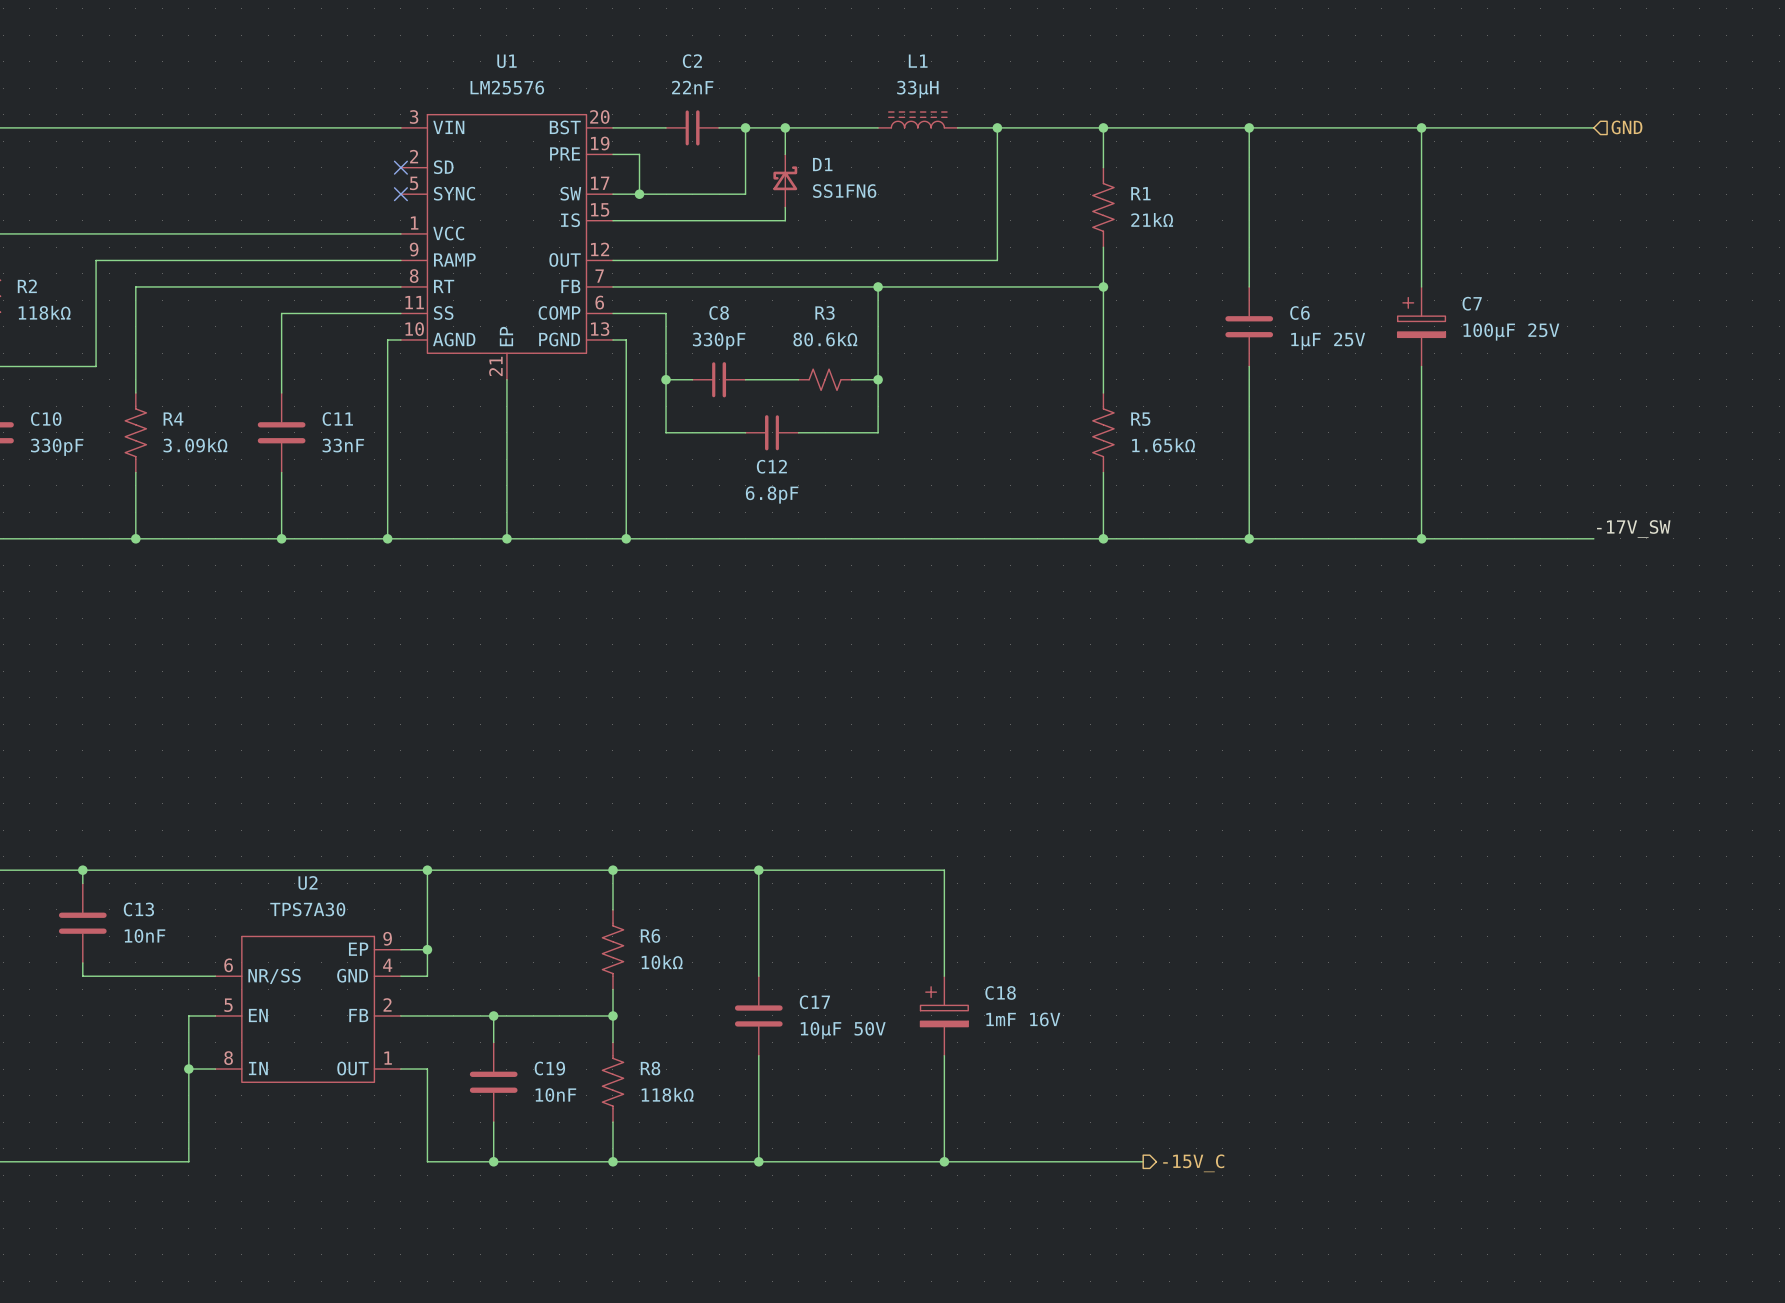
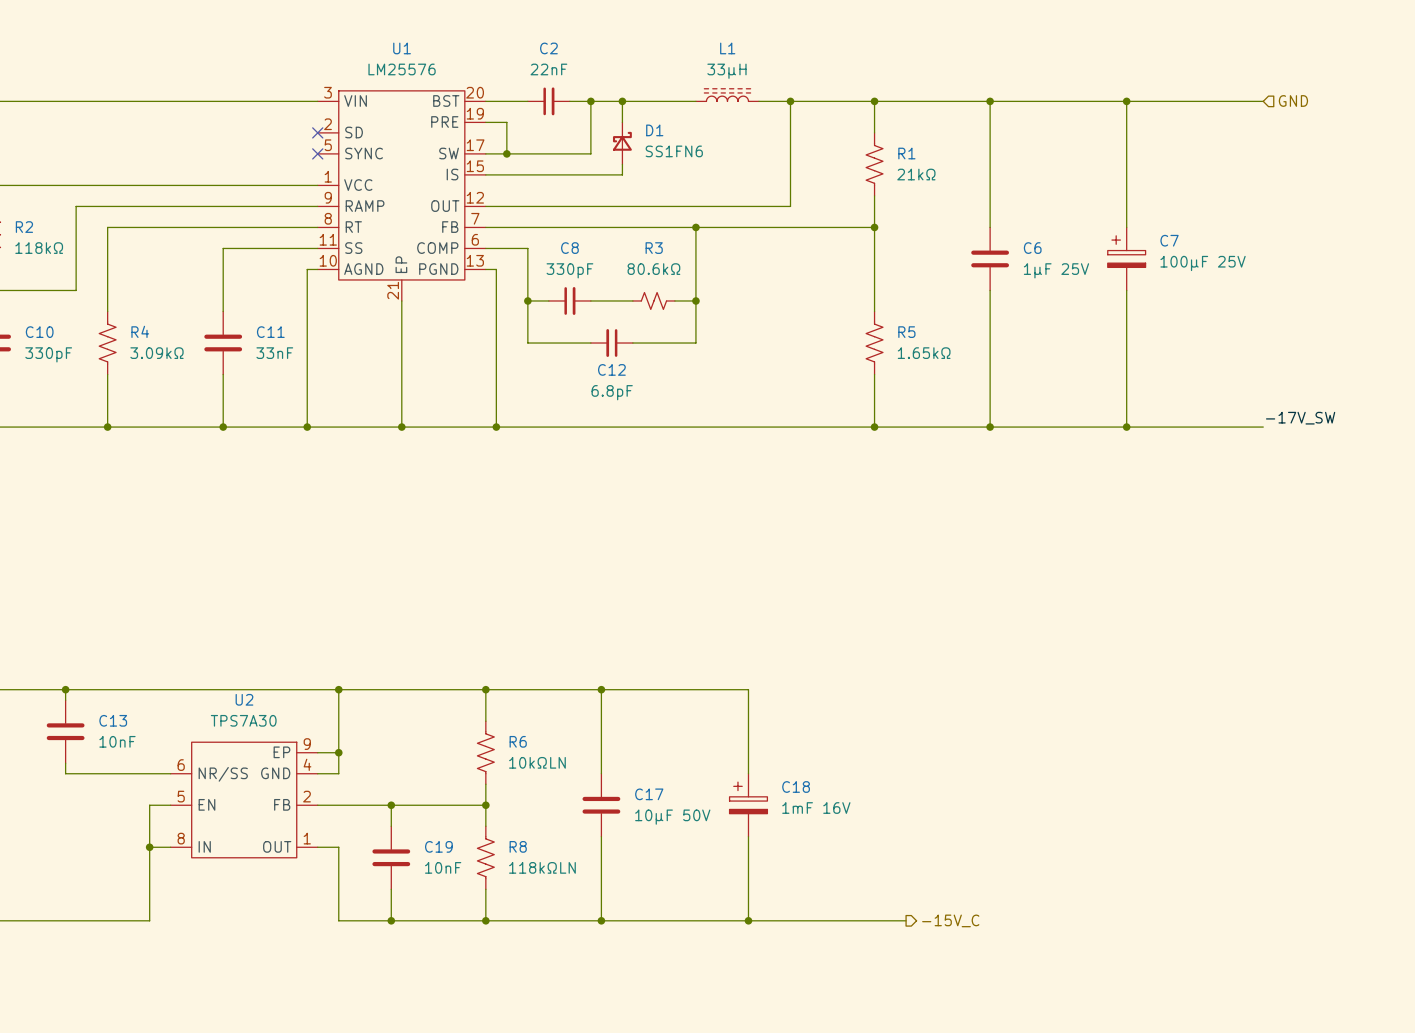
R6 value: 10kΩ (662, 962) -> 10kΩLN (537, 762)
R8 value: 118kΩ (667, 1094) -> 118kΩLN (542, 867)

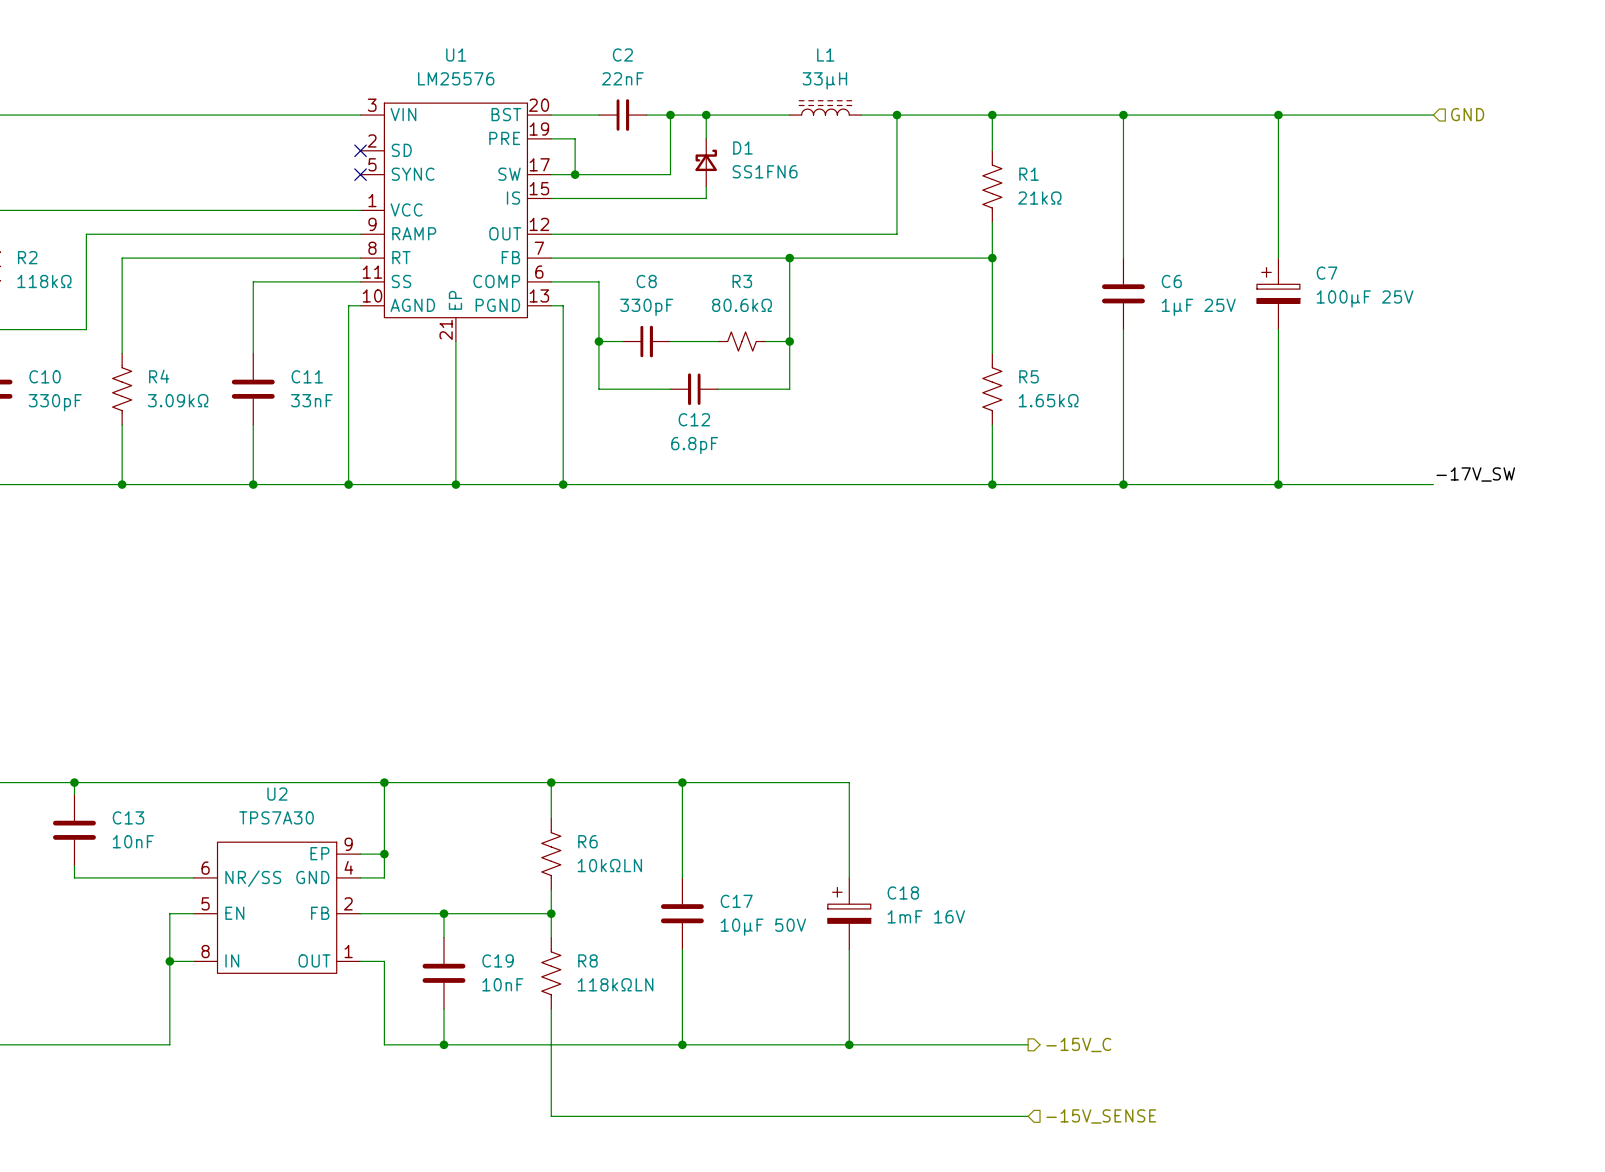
wire: none -> (551, 1044) (551, 1116) (1028, 1116)
junction: (485, 920) -> none
hierarchical label: none -> -15V_SENSE (1101, 1116)

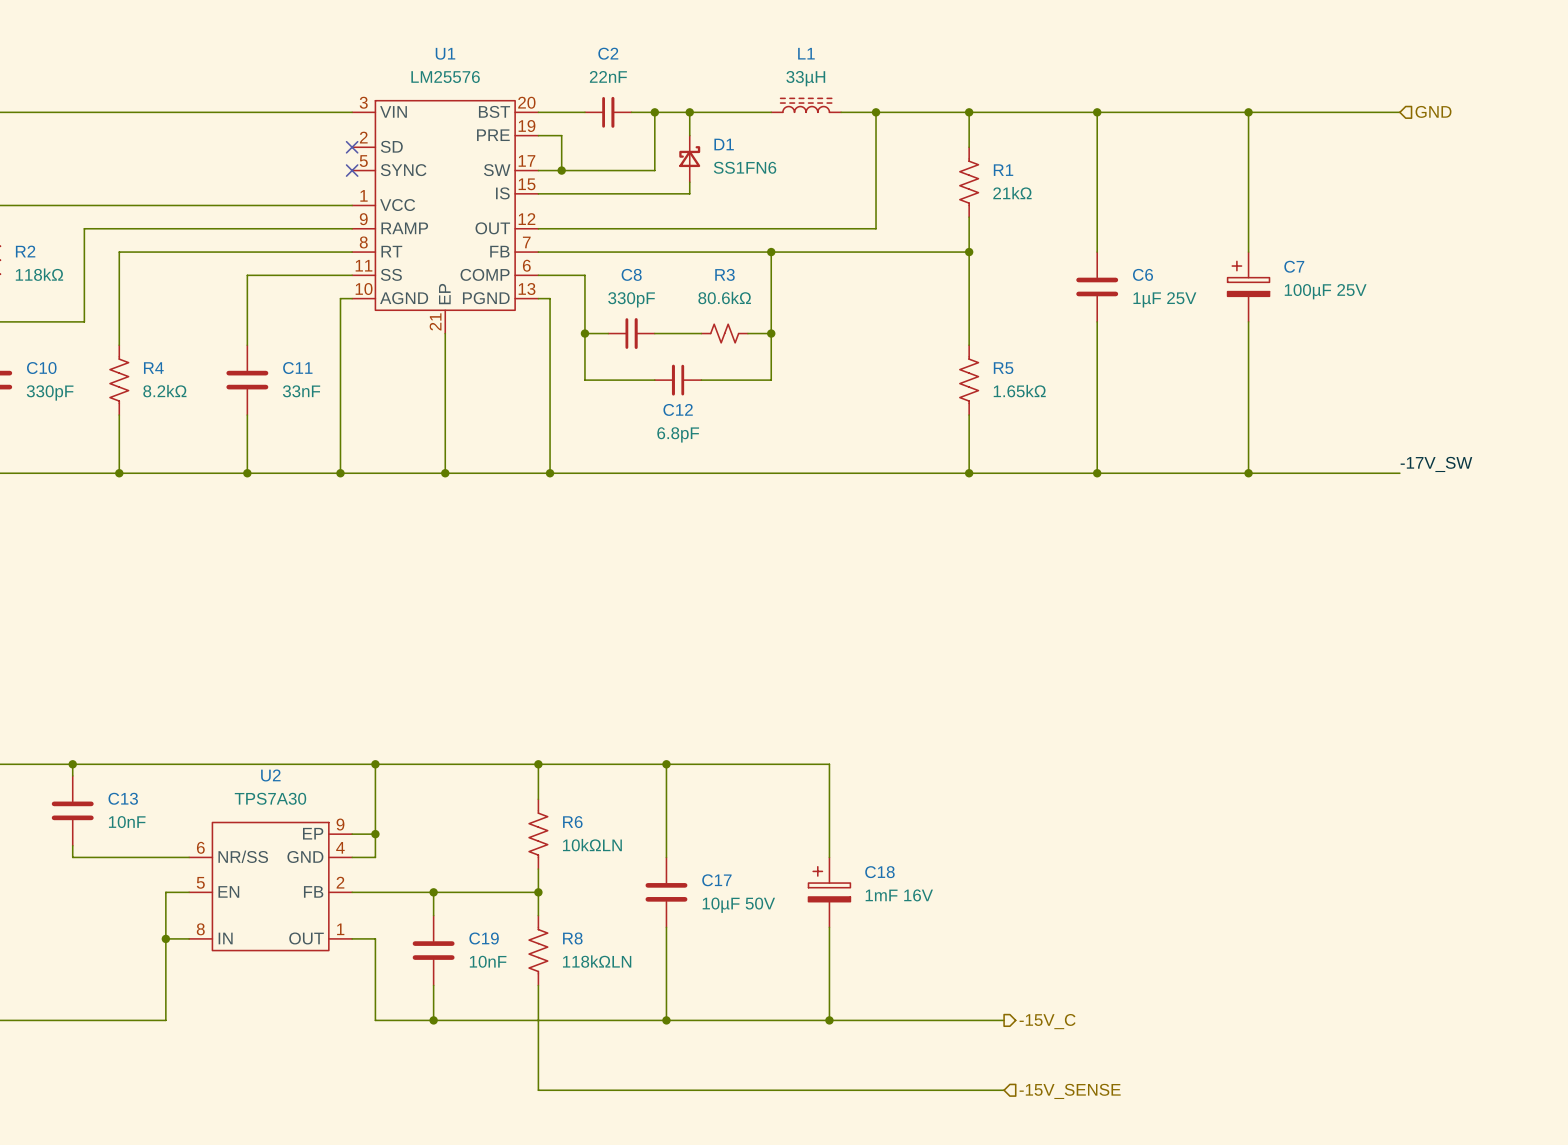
R4 value: 3.09kΩ (178, 400) -> 8.2kΩ (164, 391)

